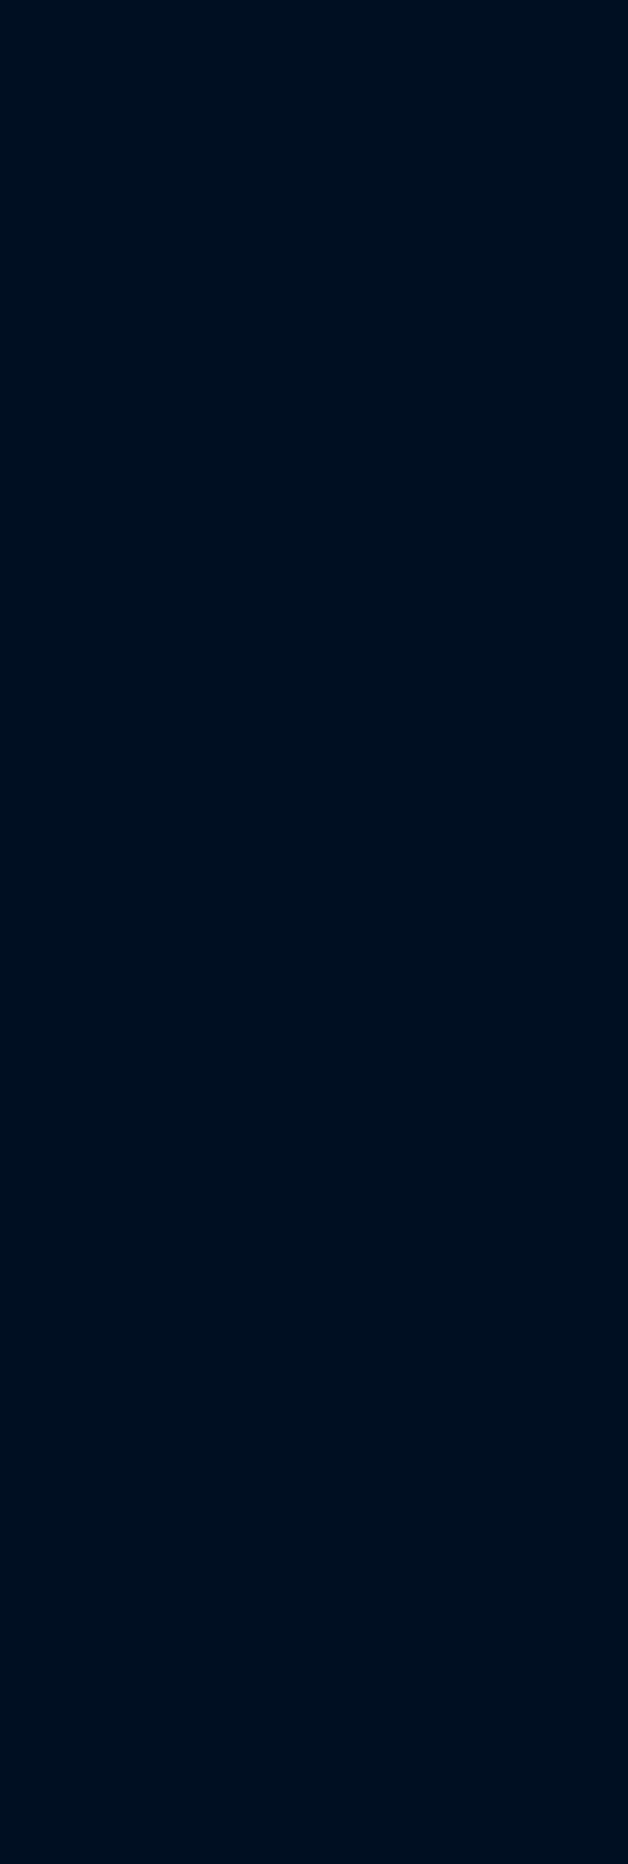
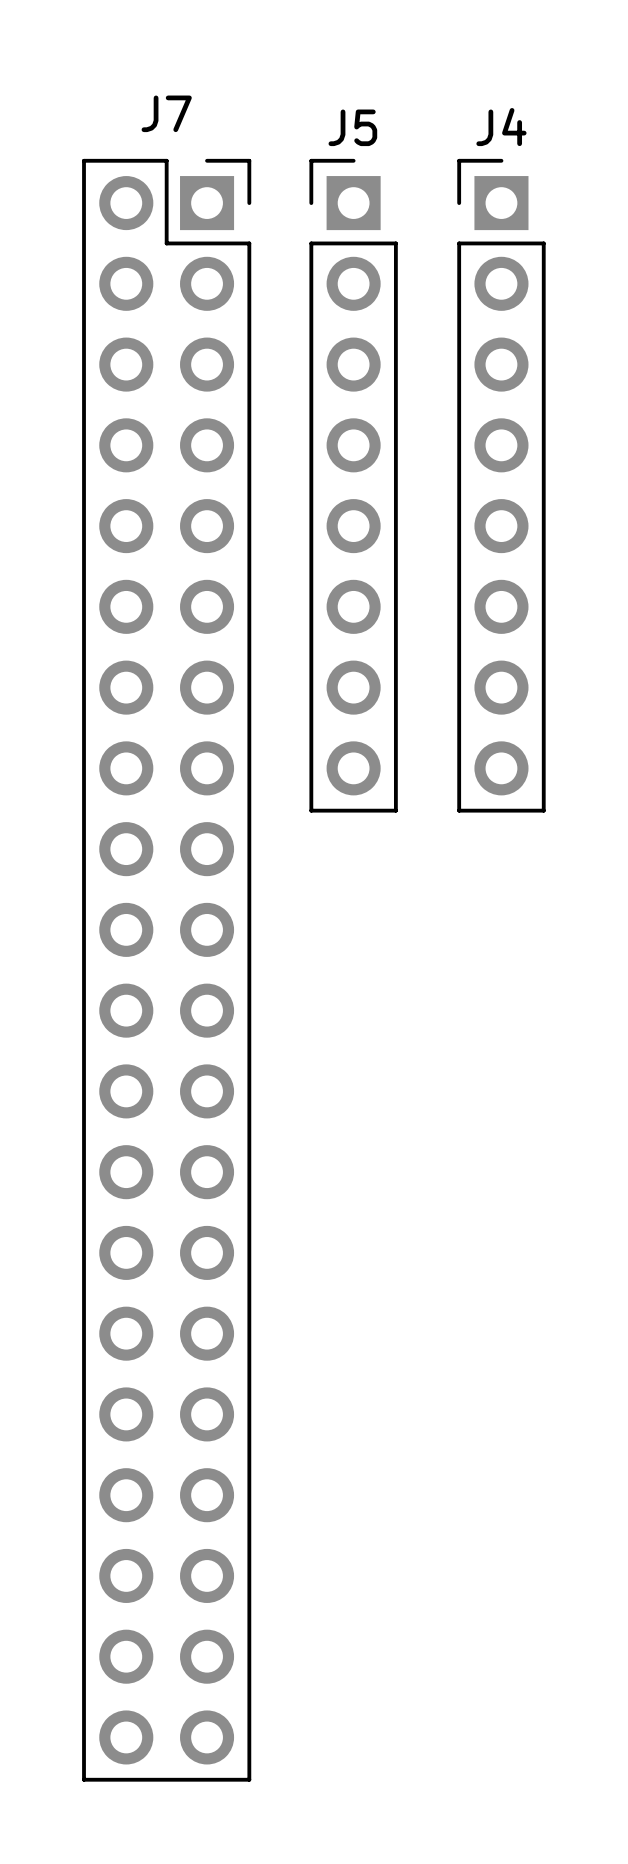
J5: none -> (353, 485)
J4: none -> (501, 485)
J7: none -> (166, 970)

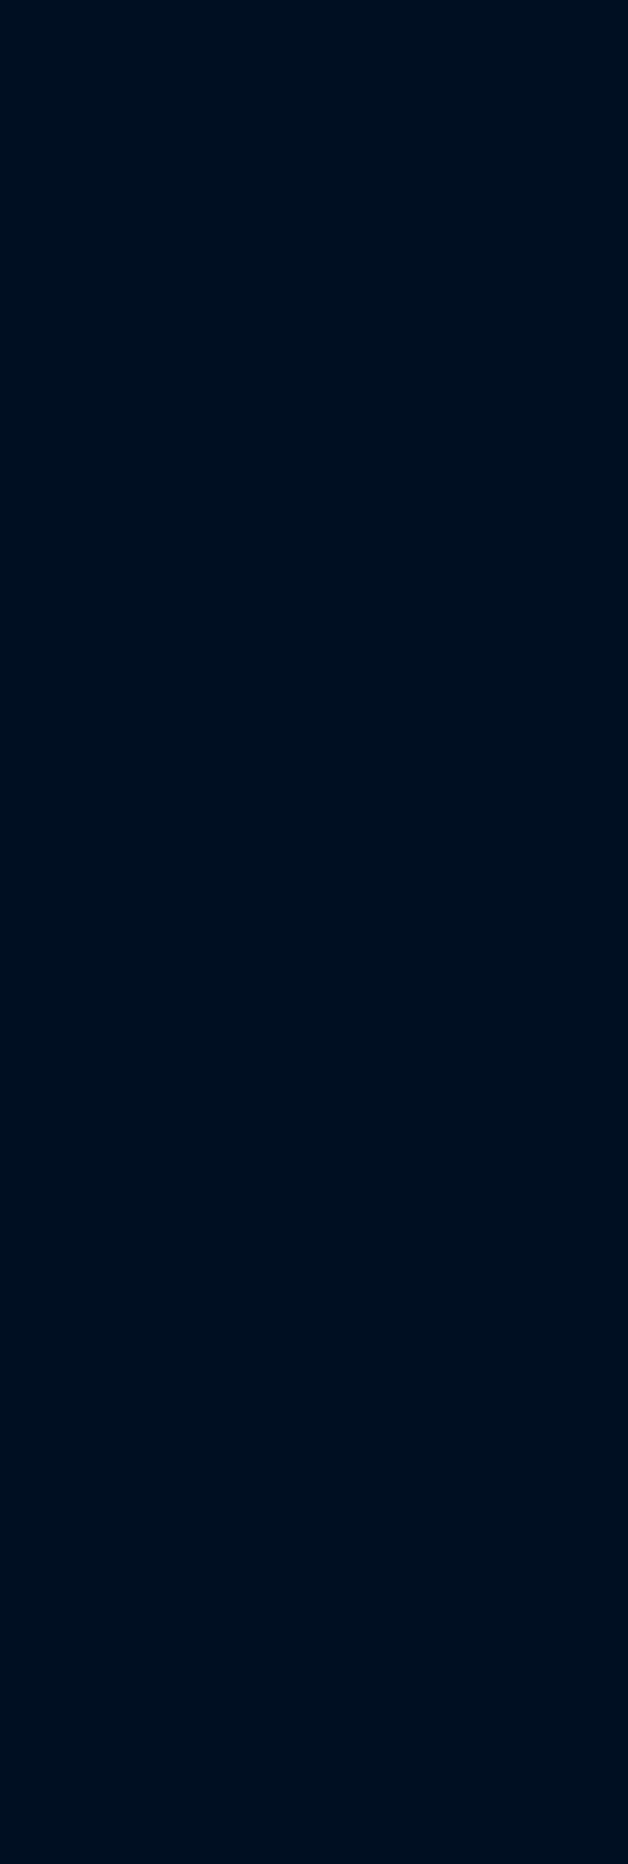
J5: (353, 485) -> none
J4: (501, 485) -> none
J7: (166, 970) -> none

